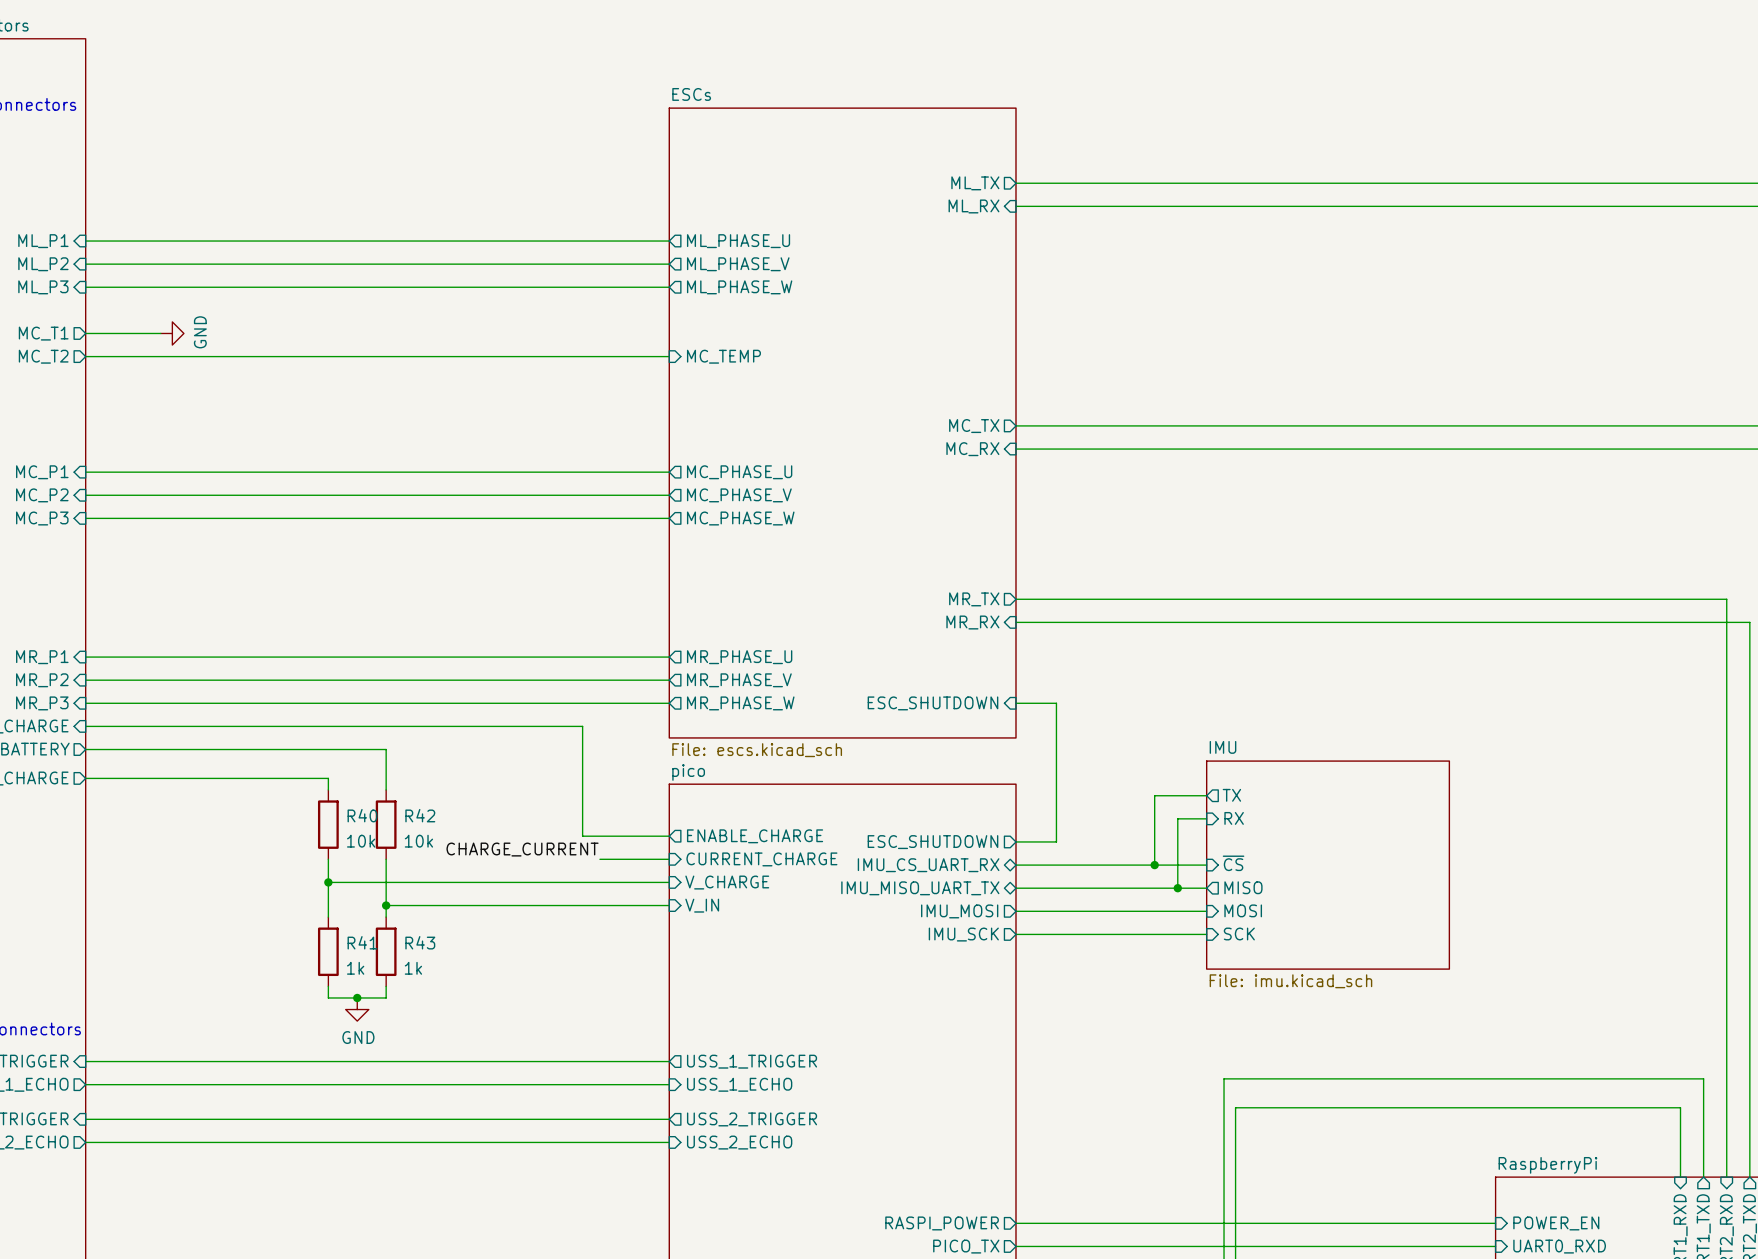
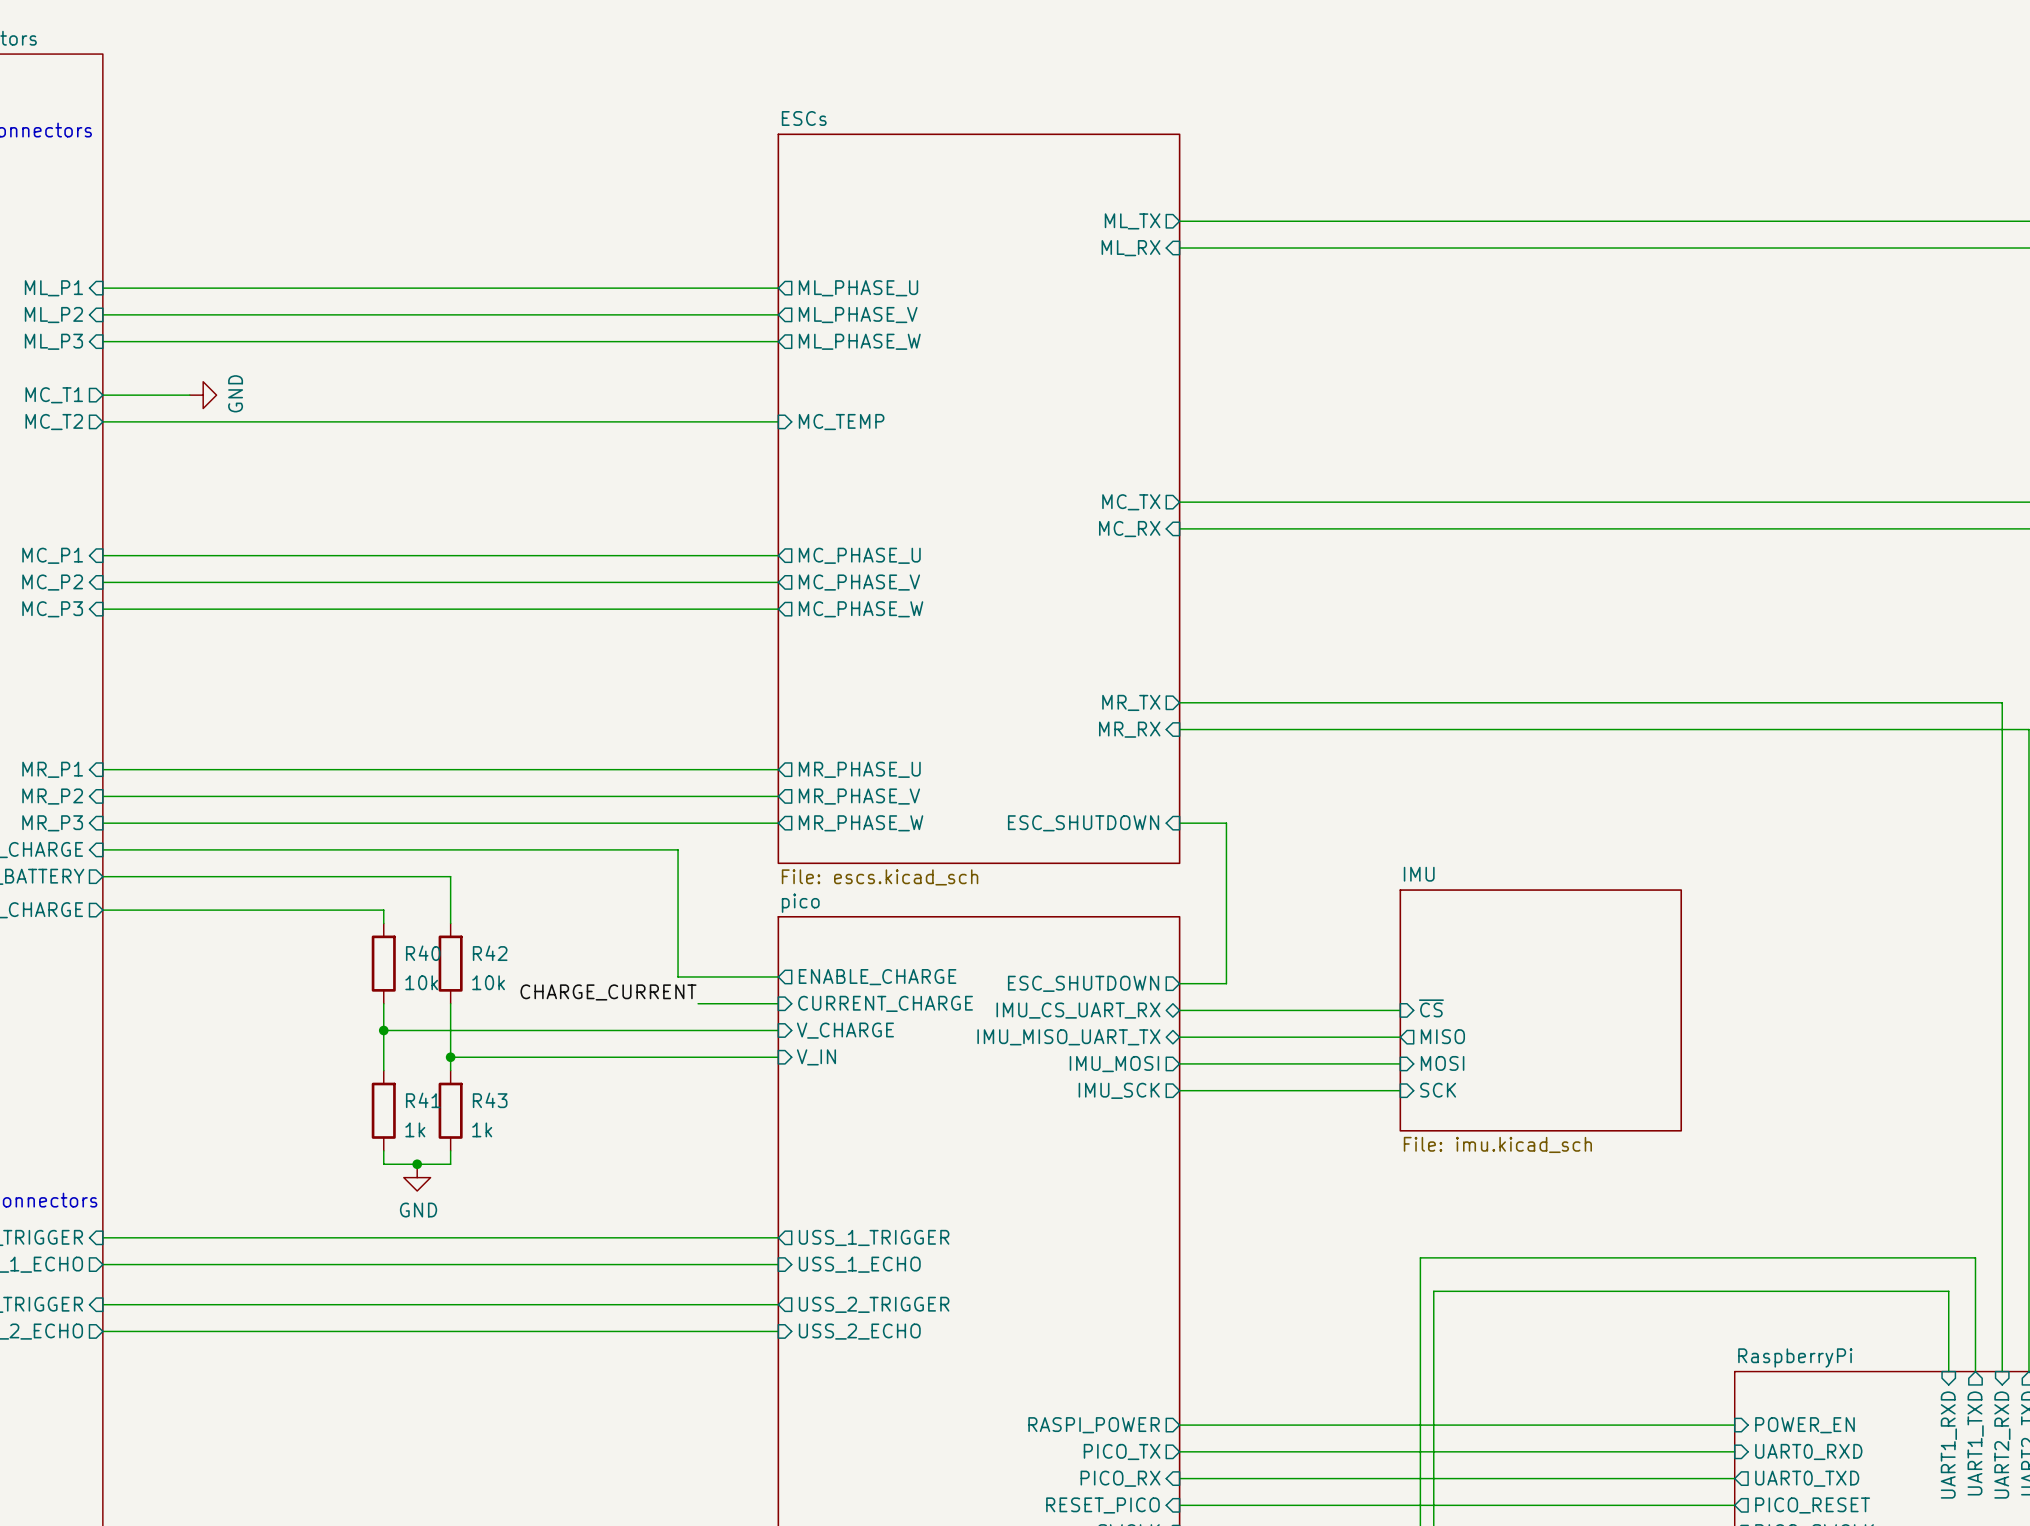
wire: (1206, 795) (1154, 795) (1154, 865) -> none
sheet pin: TX (1231, 795) -> none
wire: (1206, 818) (1177, 818) (1177, 888) -> none
sheet pin: RX (1234, 818) -> none
junction: (1154, 865) -> none
junction: (1177, 888) -> none

